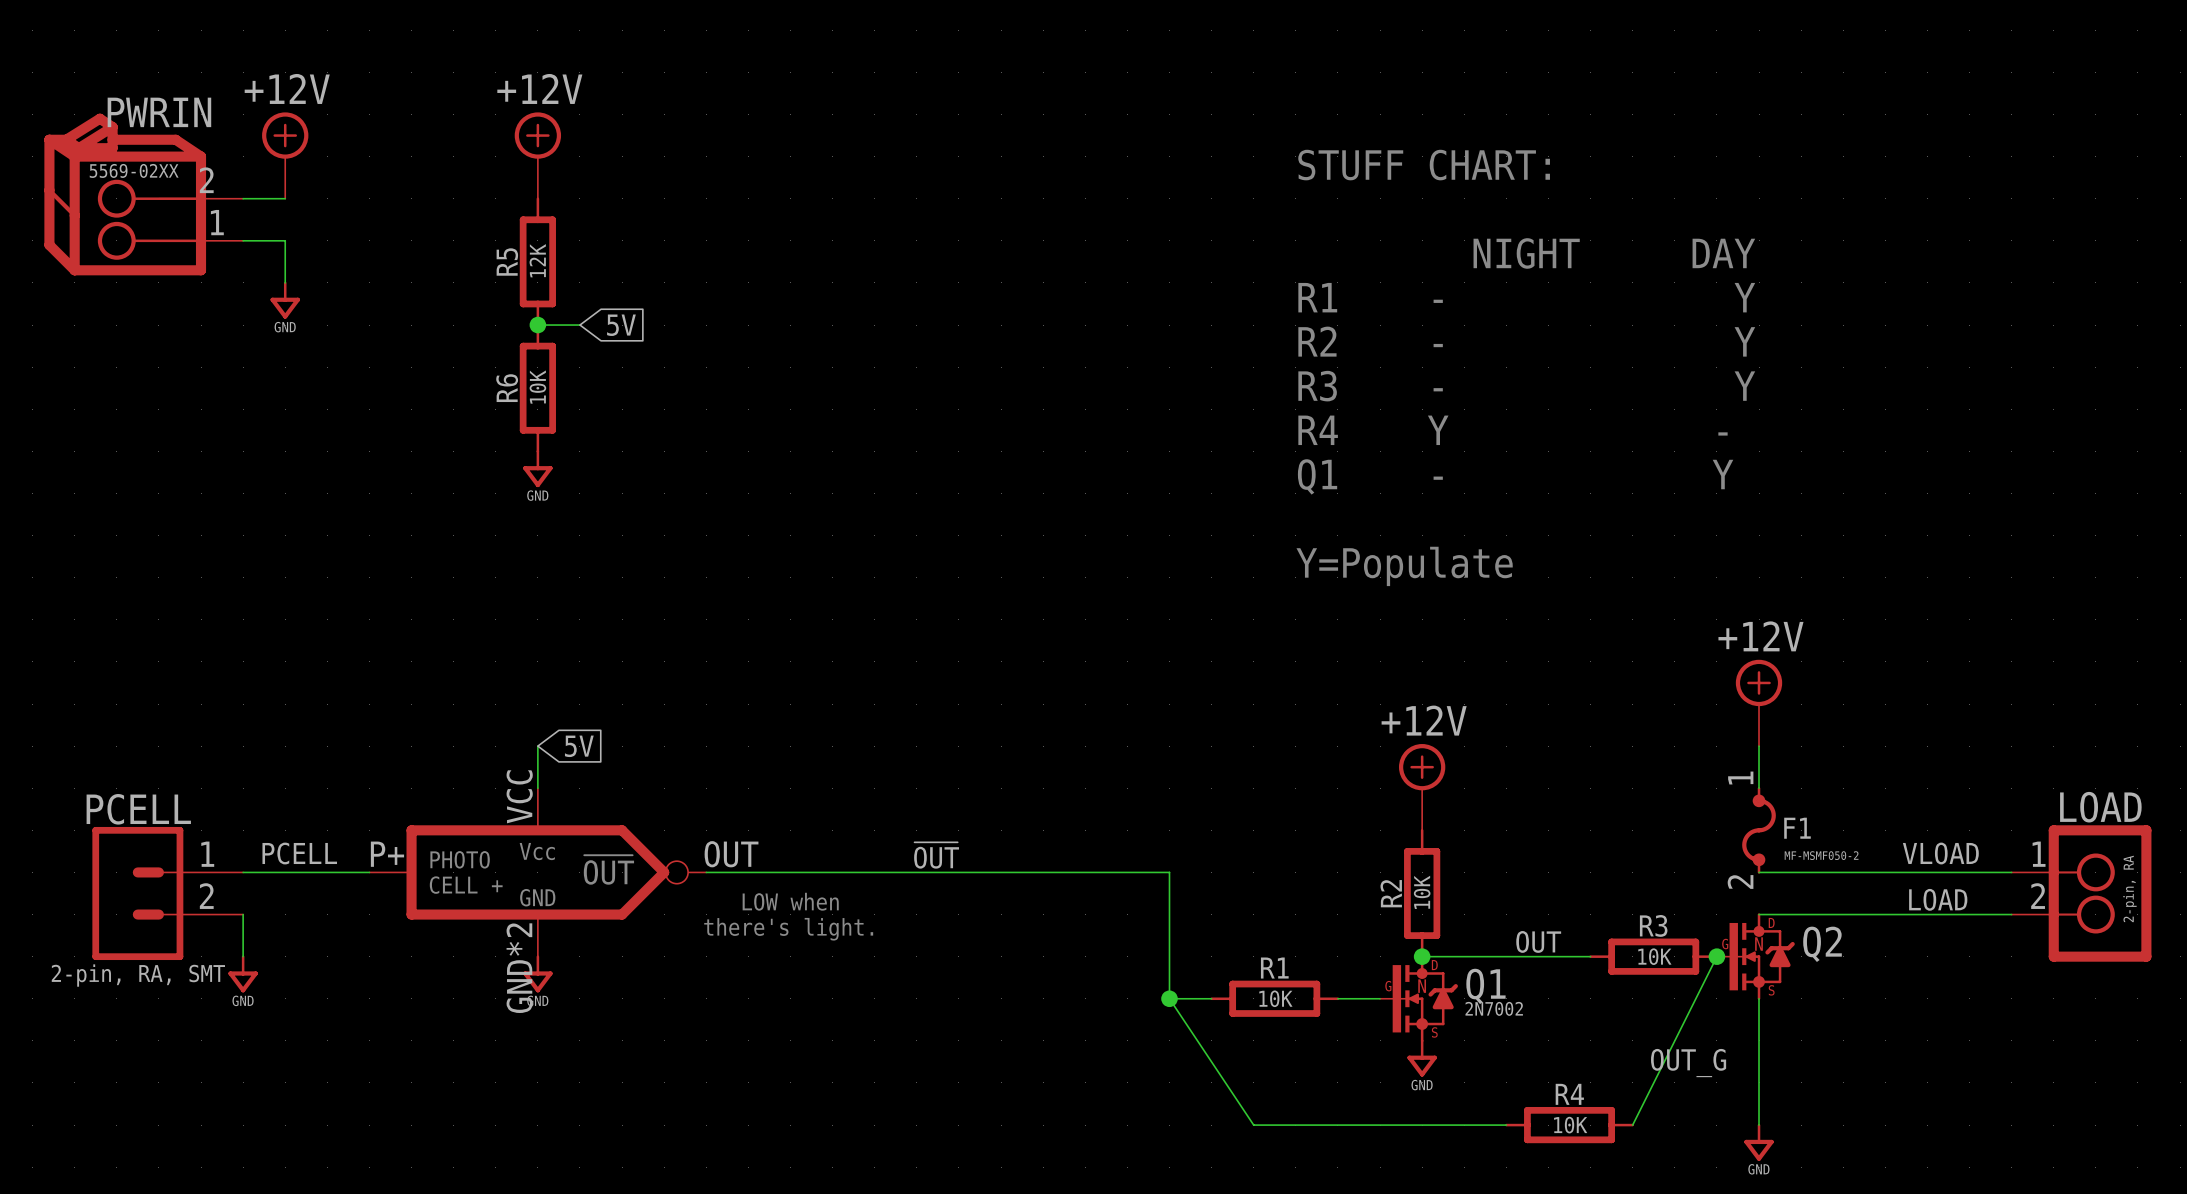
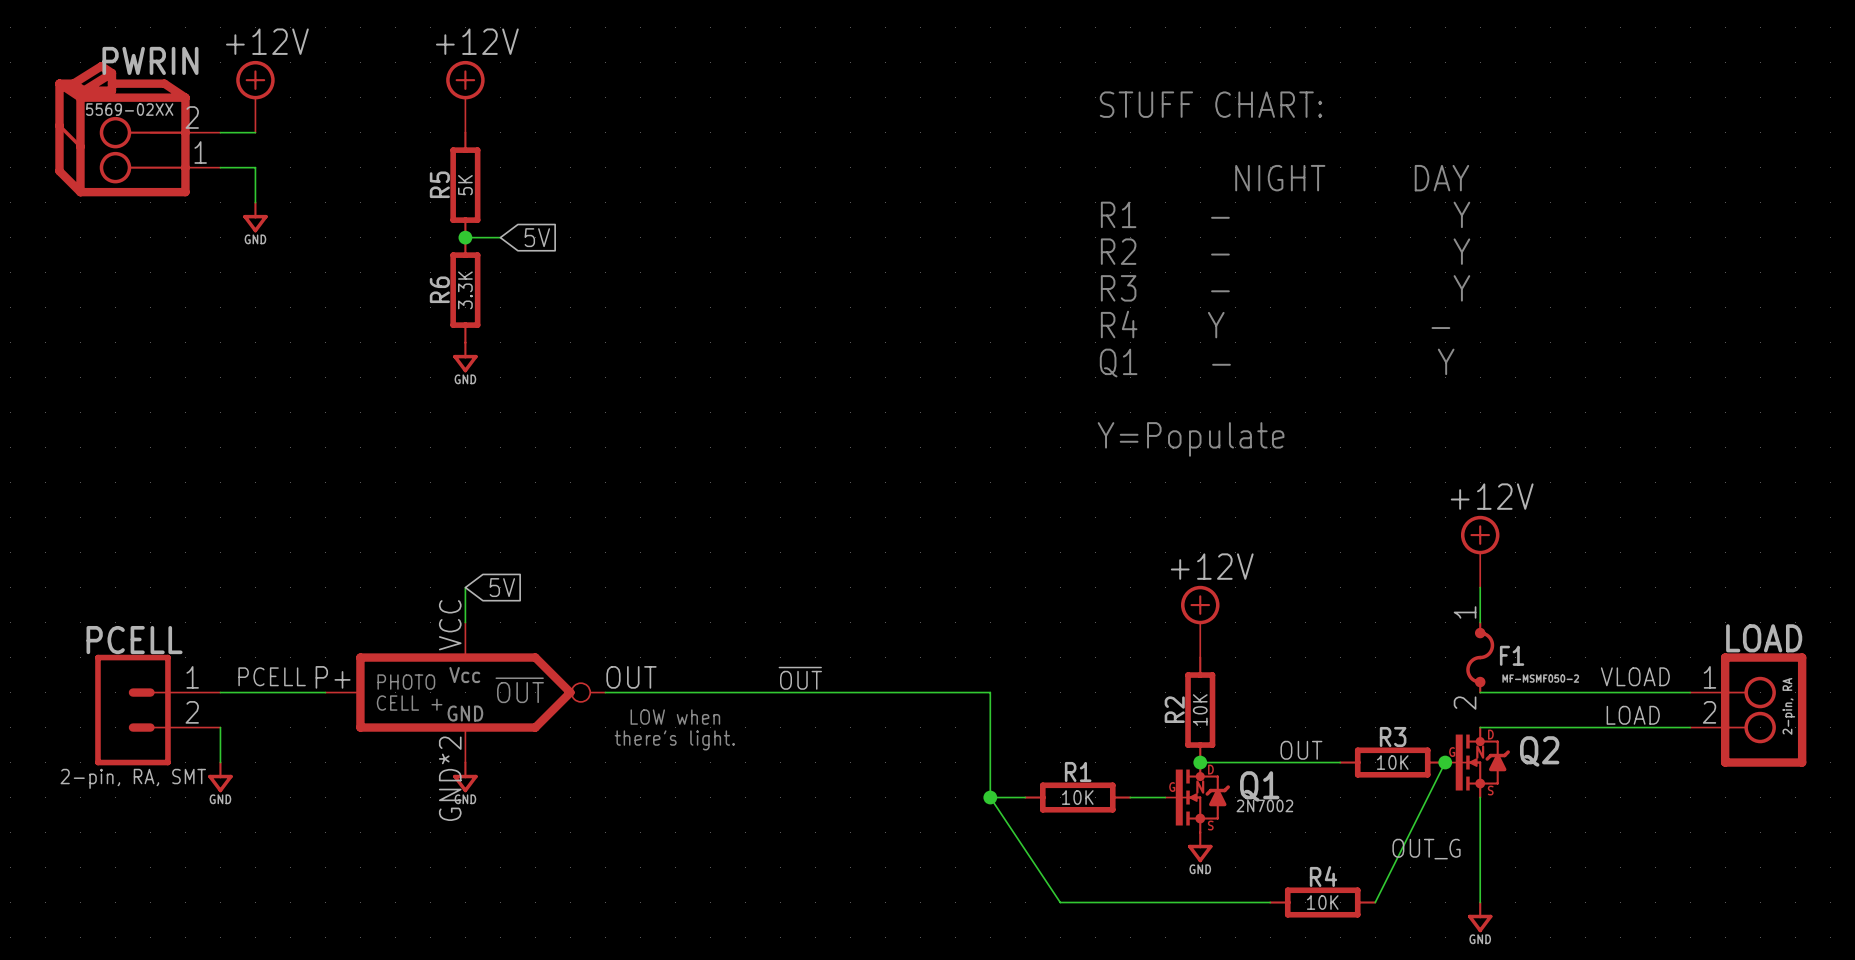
R5 value: 12K (537, 260) -> 5K (465, 185)
R6 value: 10K (537, 387) -> 3.3K (465, 290)

